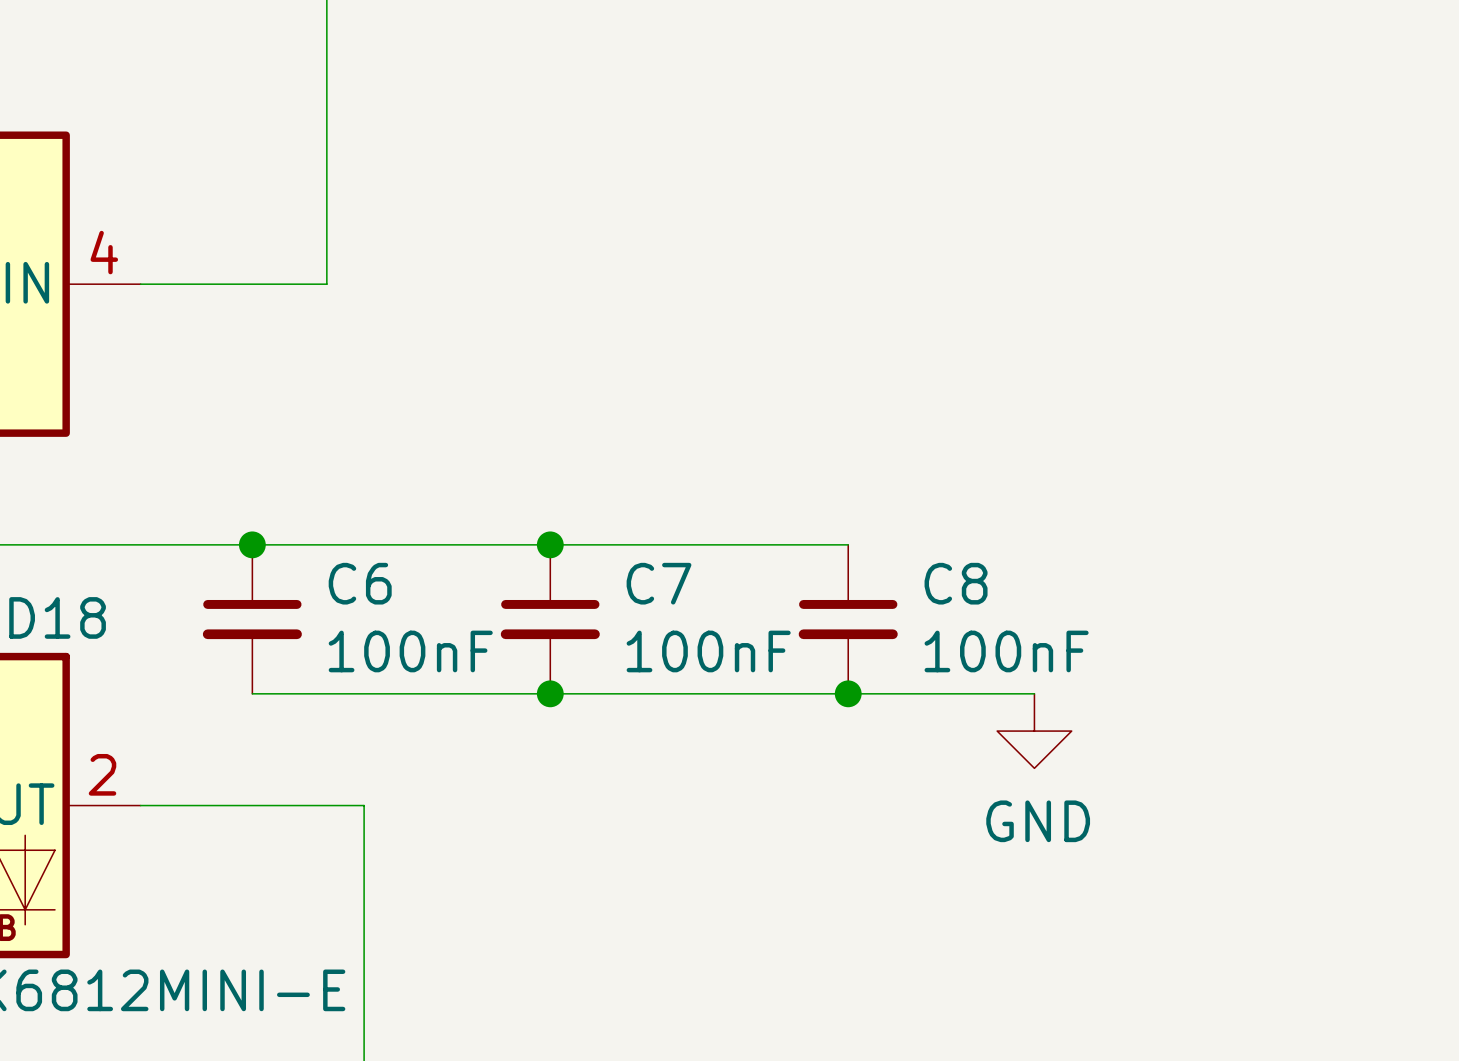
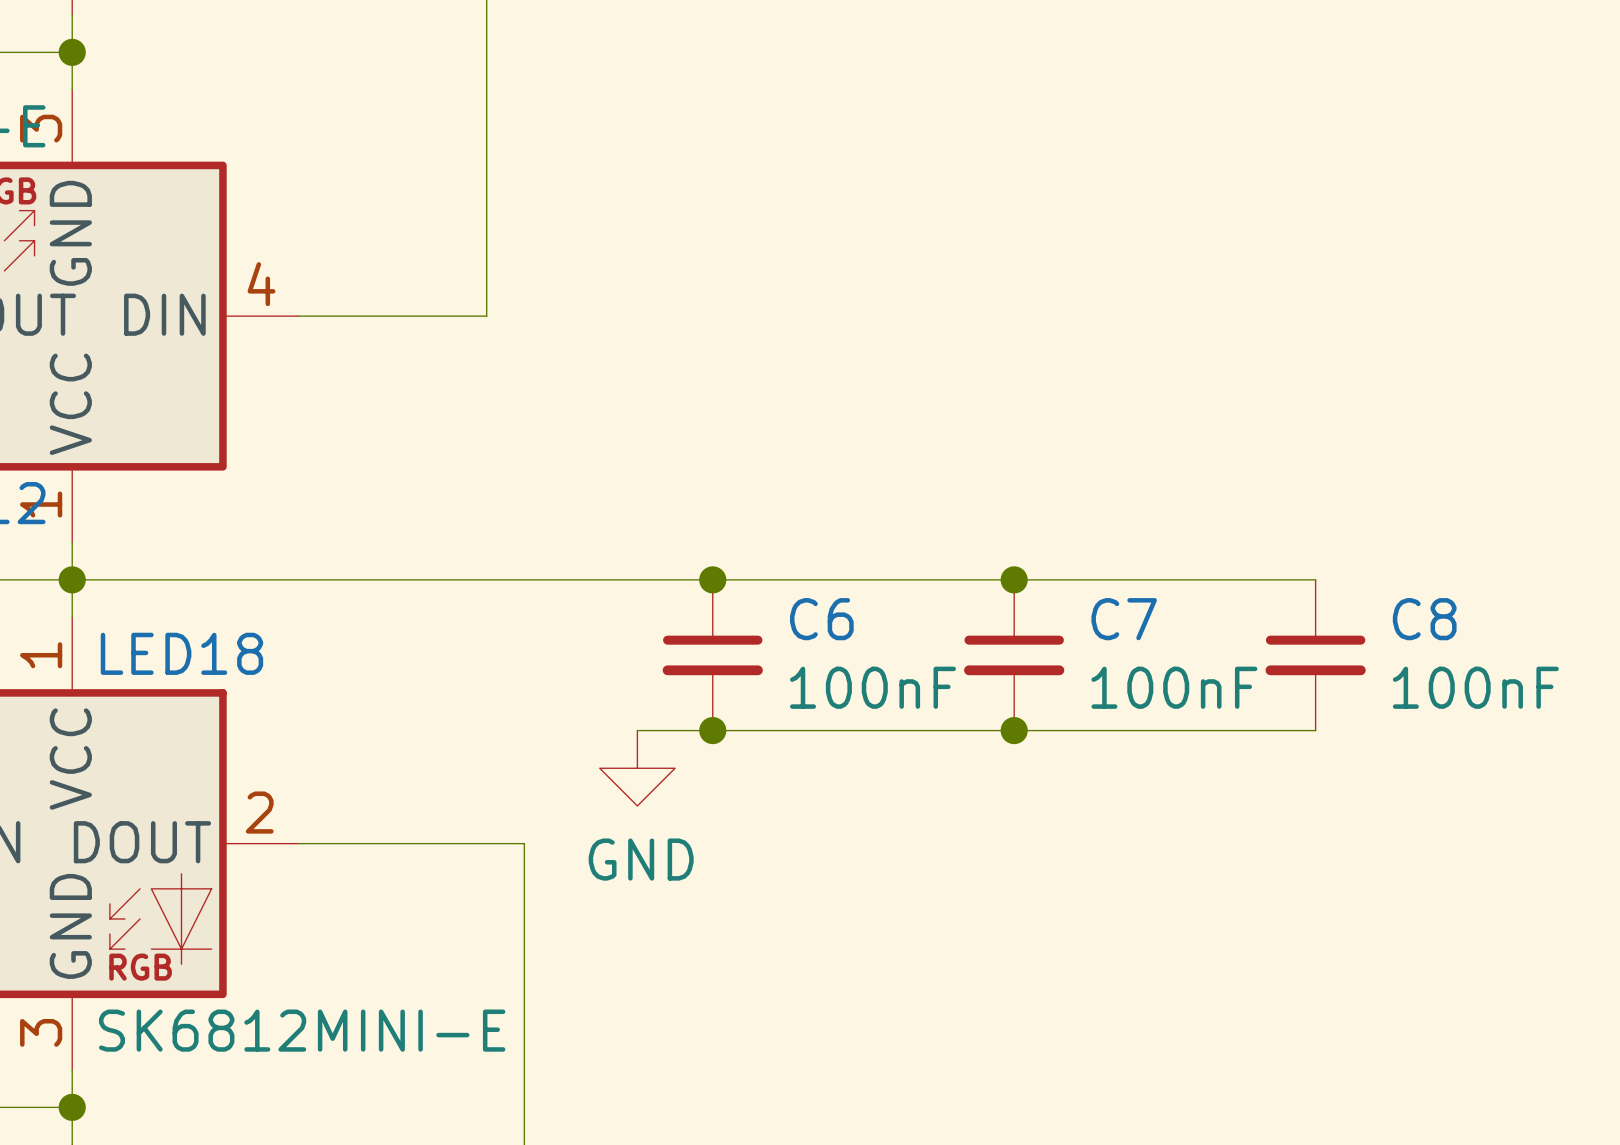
junction: (252, 544) -> none
wire: none -> (1014, 579) (1315, 579)
junction: none -> (1014, 579)
C7 name: C7 (659, 583) -> C6 (821, 619)
C8 name: C8 (956, 583) -> C7 (1124, 619)
C6: 100nF (252, 619) -> none
C8: none -> 100nF (1315, 655)
wire: (252, 693) (475, 693) -> none
wire: none -> (1202, 730) (1315, 730)
power symbol position: GND (1034, 731) -> GND (637, 768)

